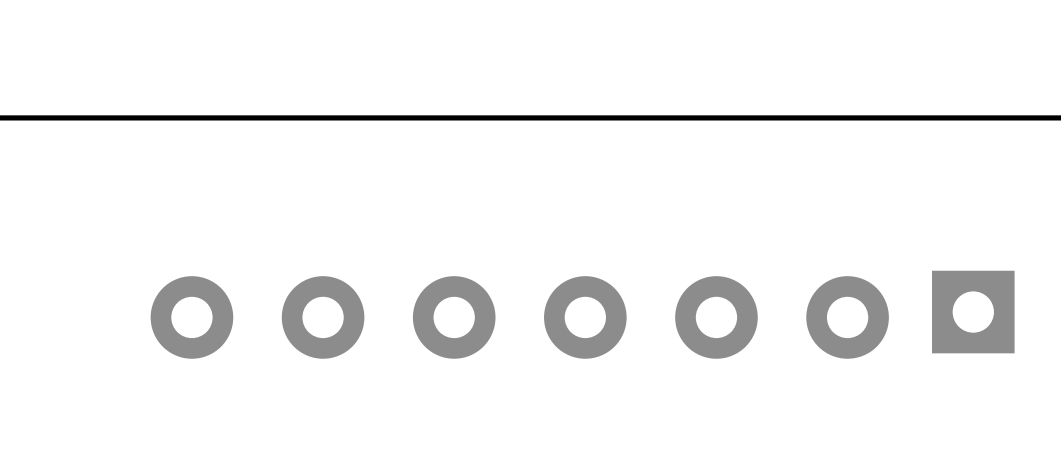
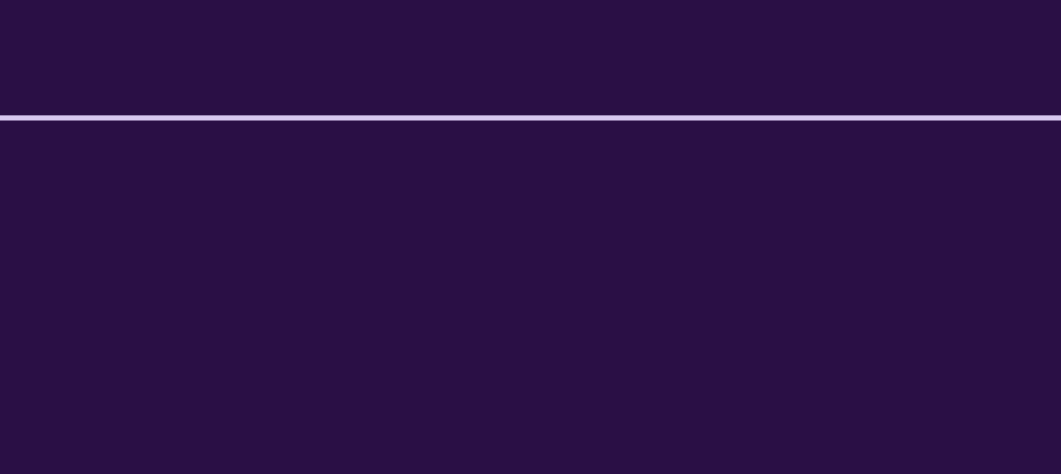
part: (582, 314) -> none

